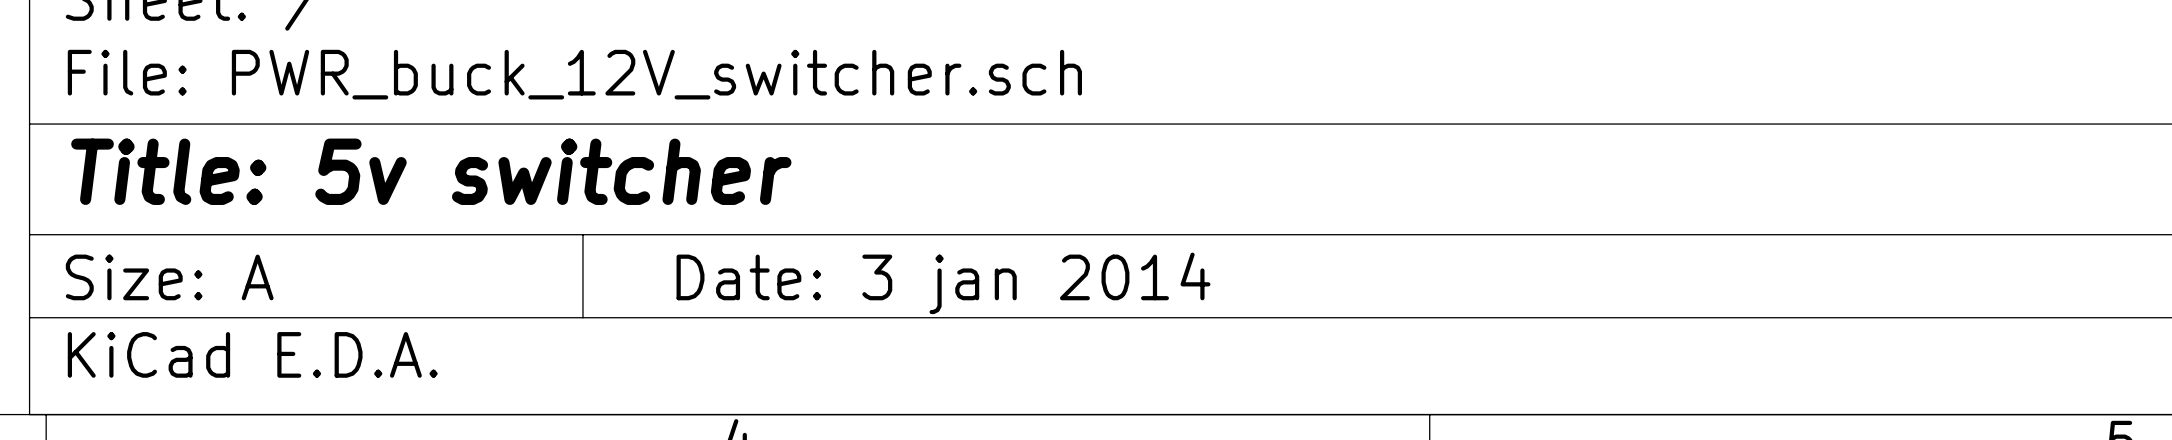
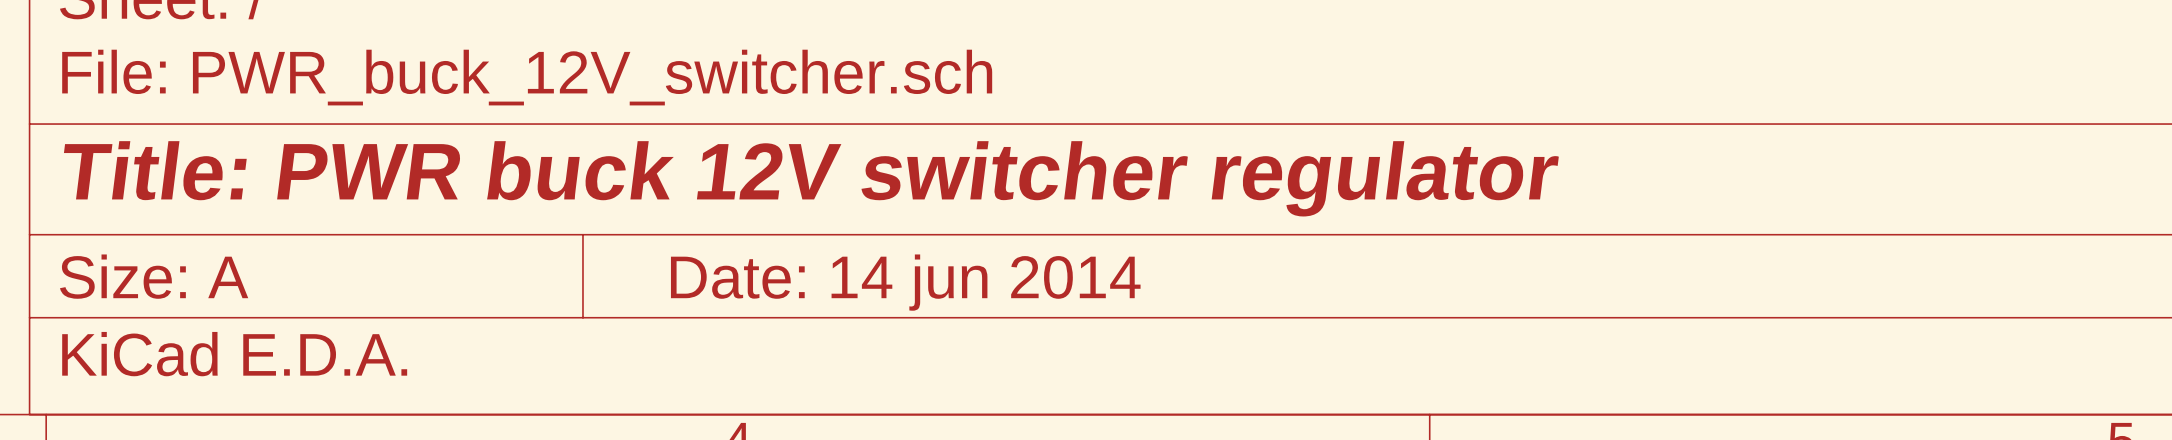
title block: Title: 5v switcher (431, 171) -> Title: PWR buck 12V switcher regulator (811, 178)
title block: Date: 3 jan 2014 (943, 283) -> Date: 14 jun 2014 (905, 282)

